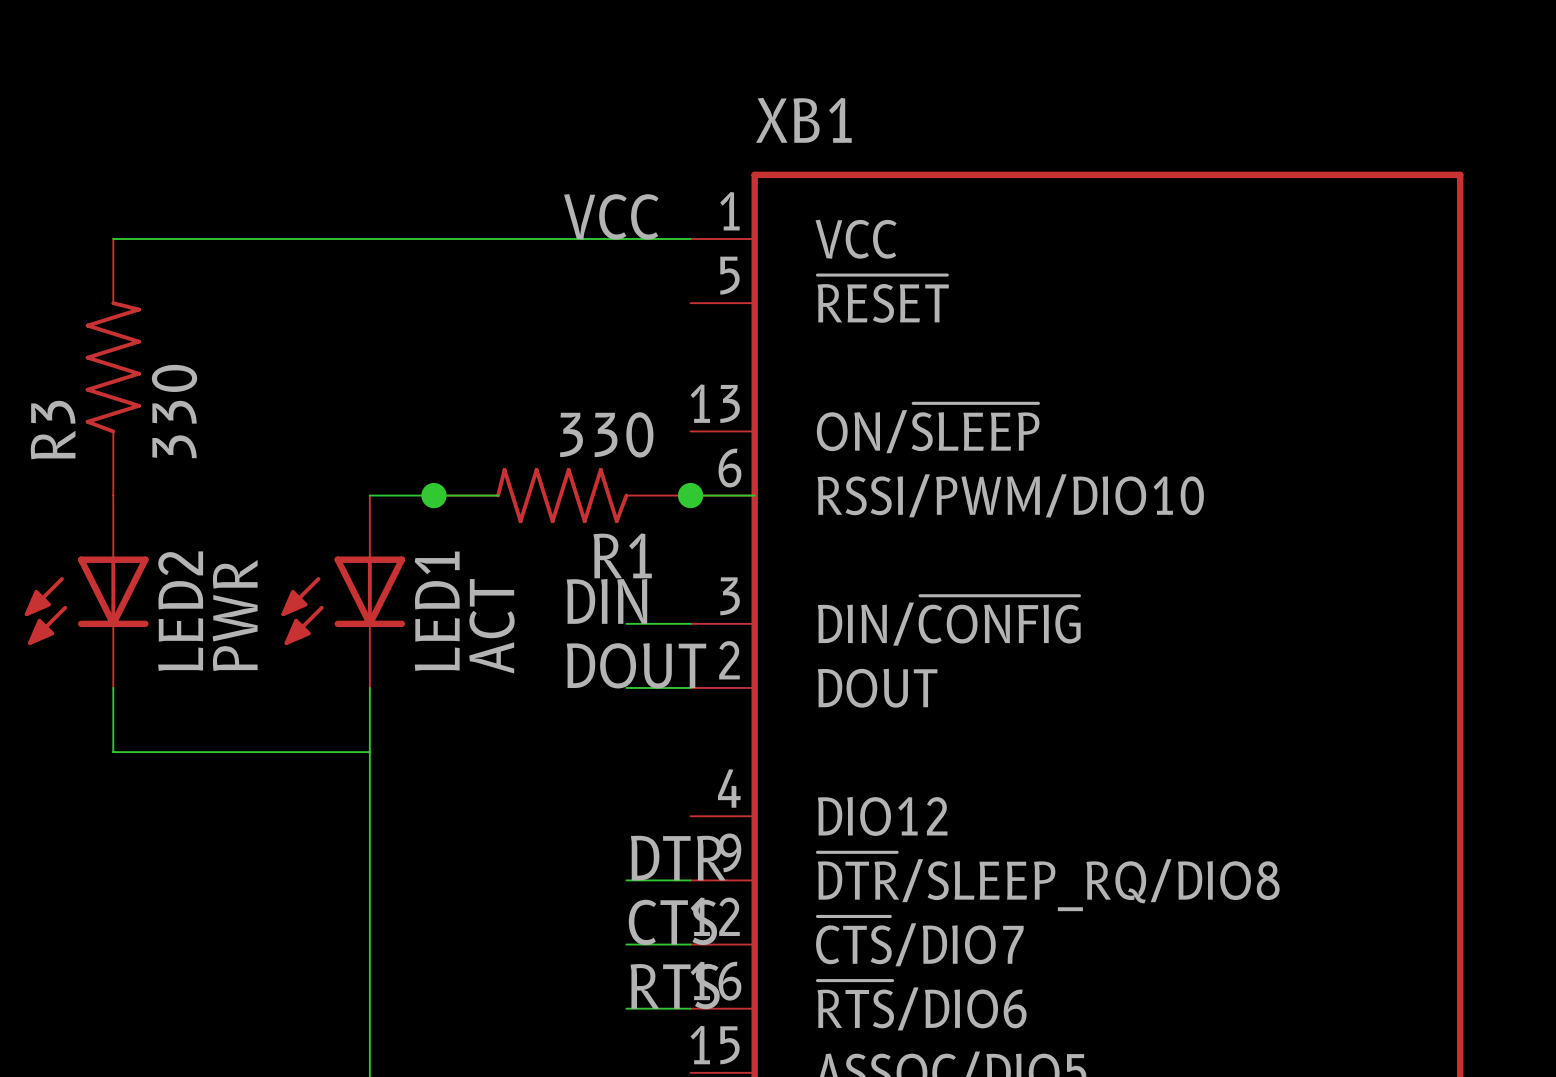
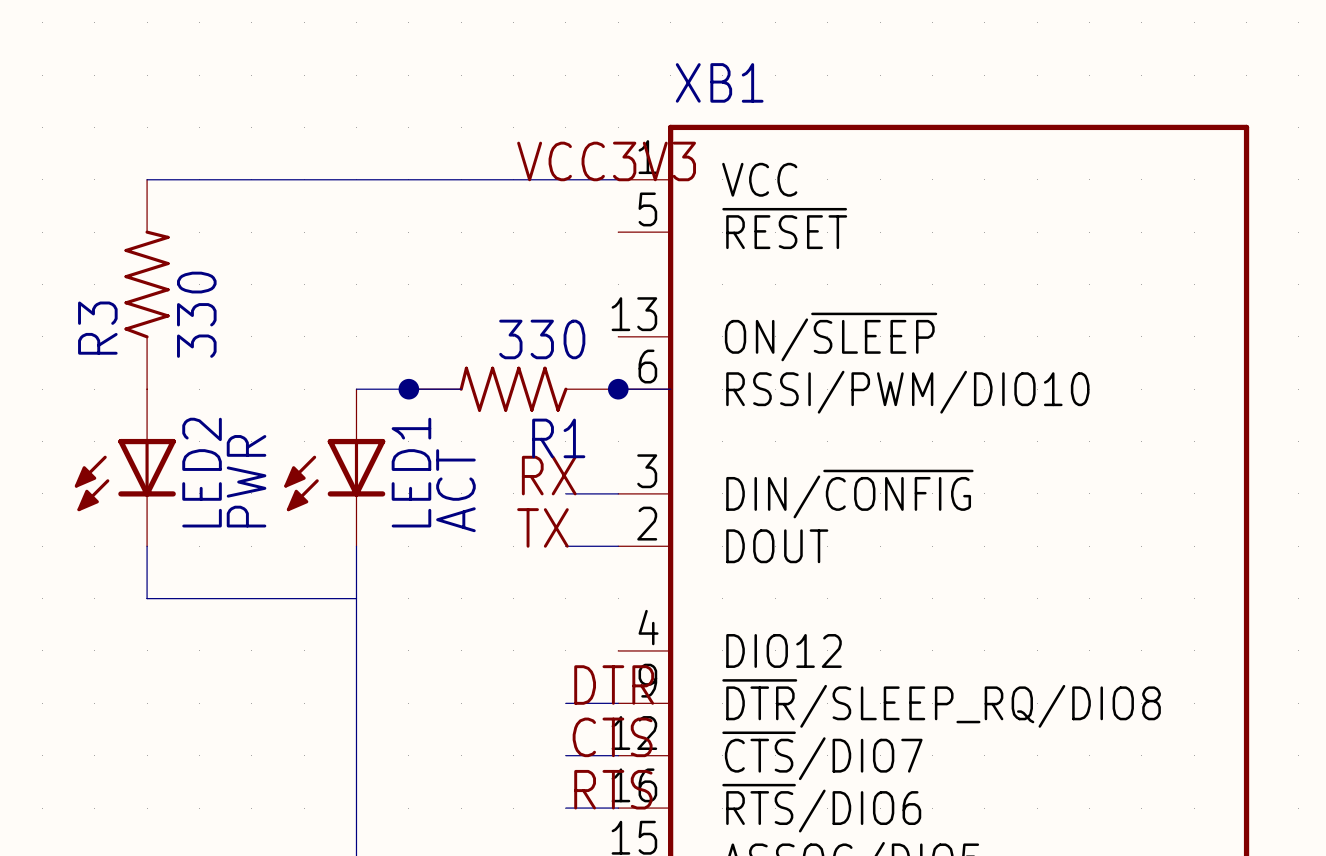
label: VCC (611, 216) -> VCC3V3 (606, 161)
label: DIN (607, 601) -> RX (549, 475)
label: DOUT (636, 665) -> TX (542, 527)

